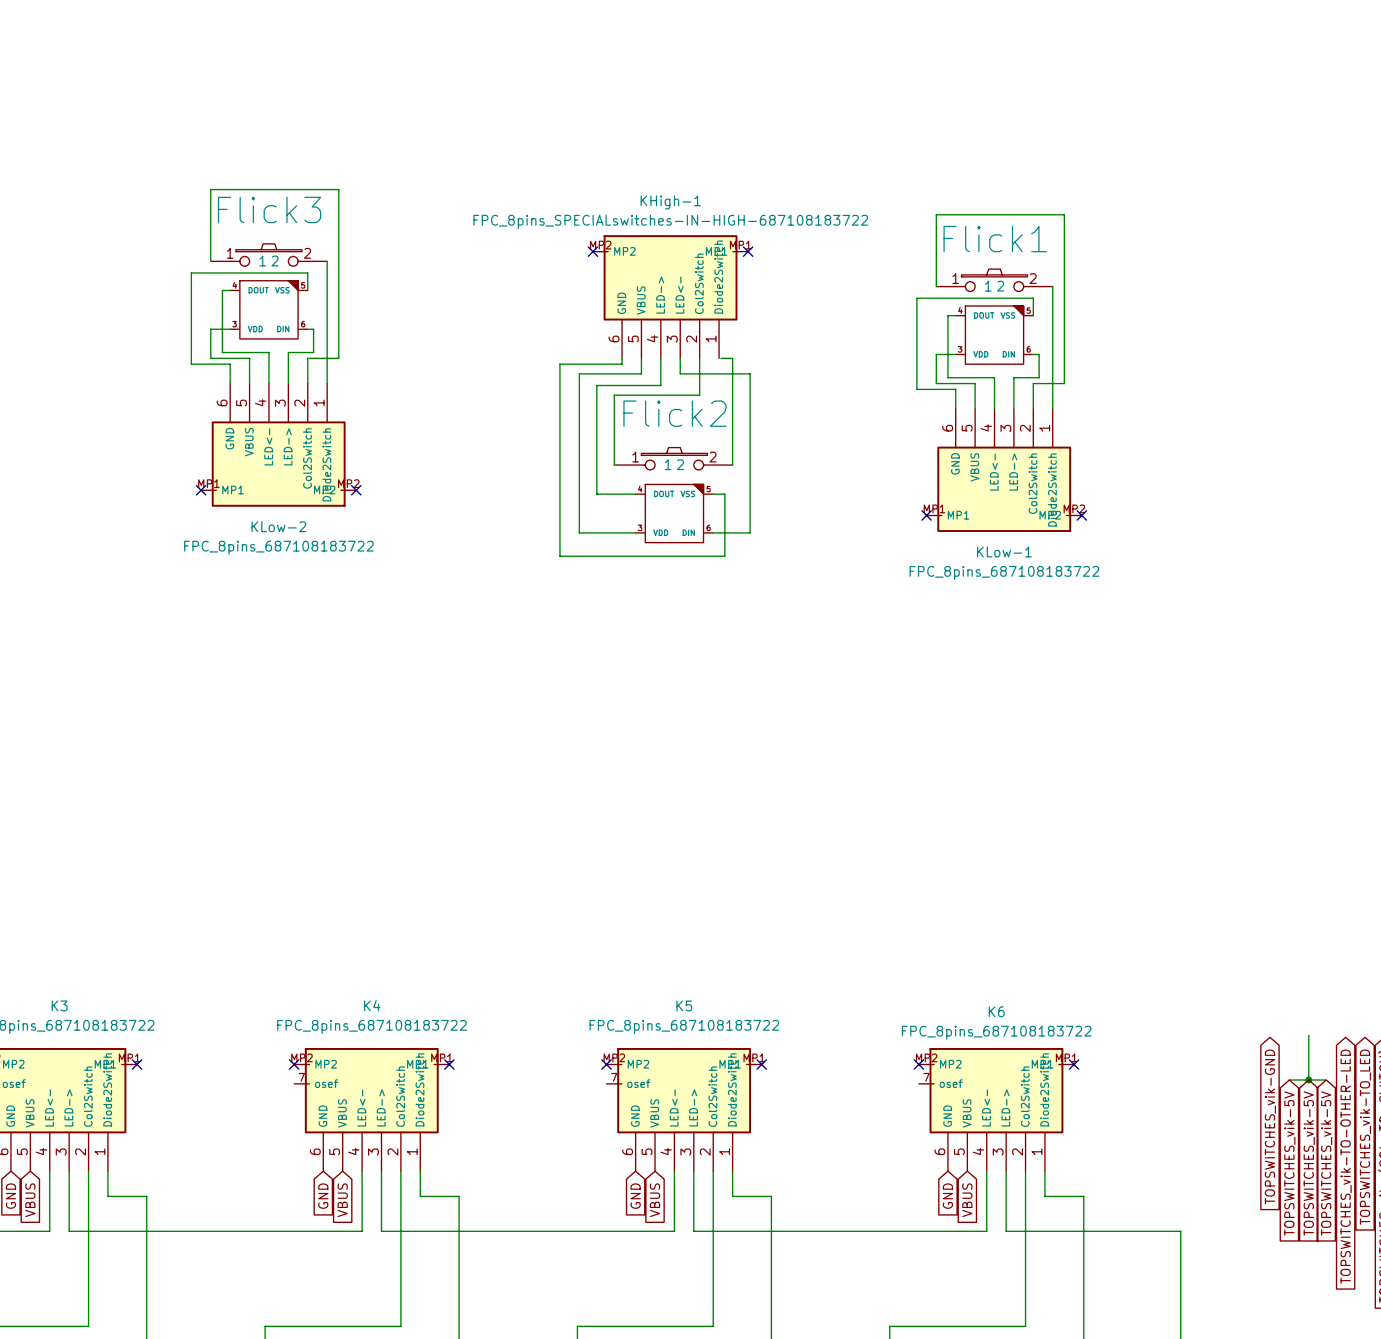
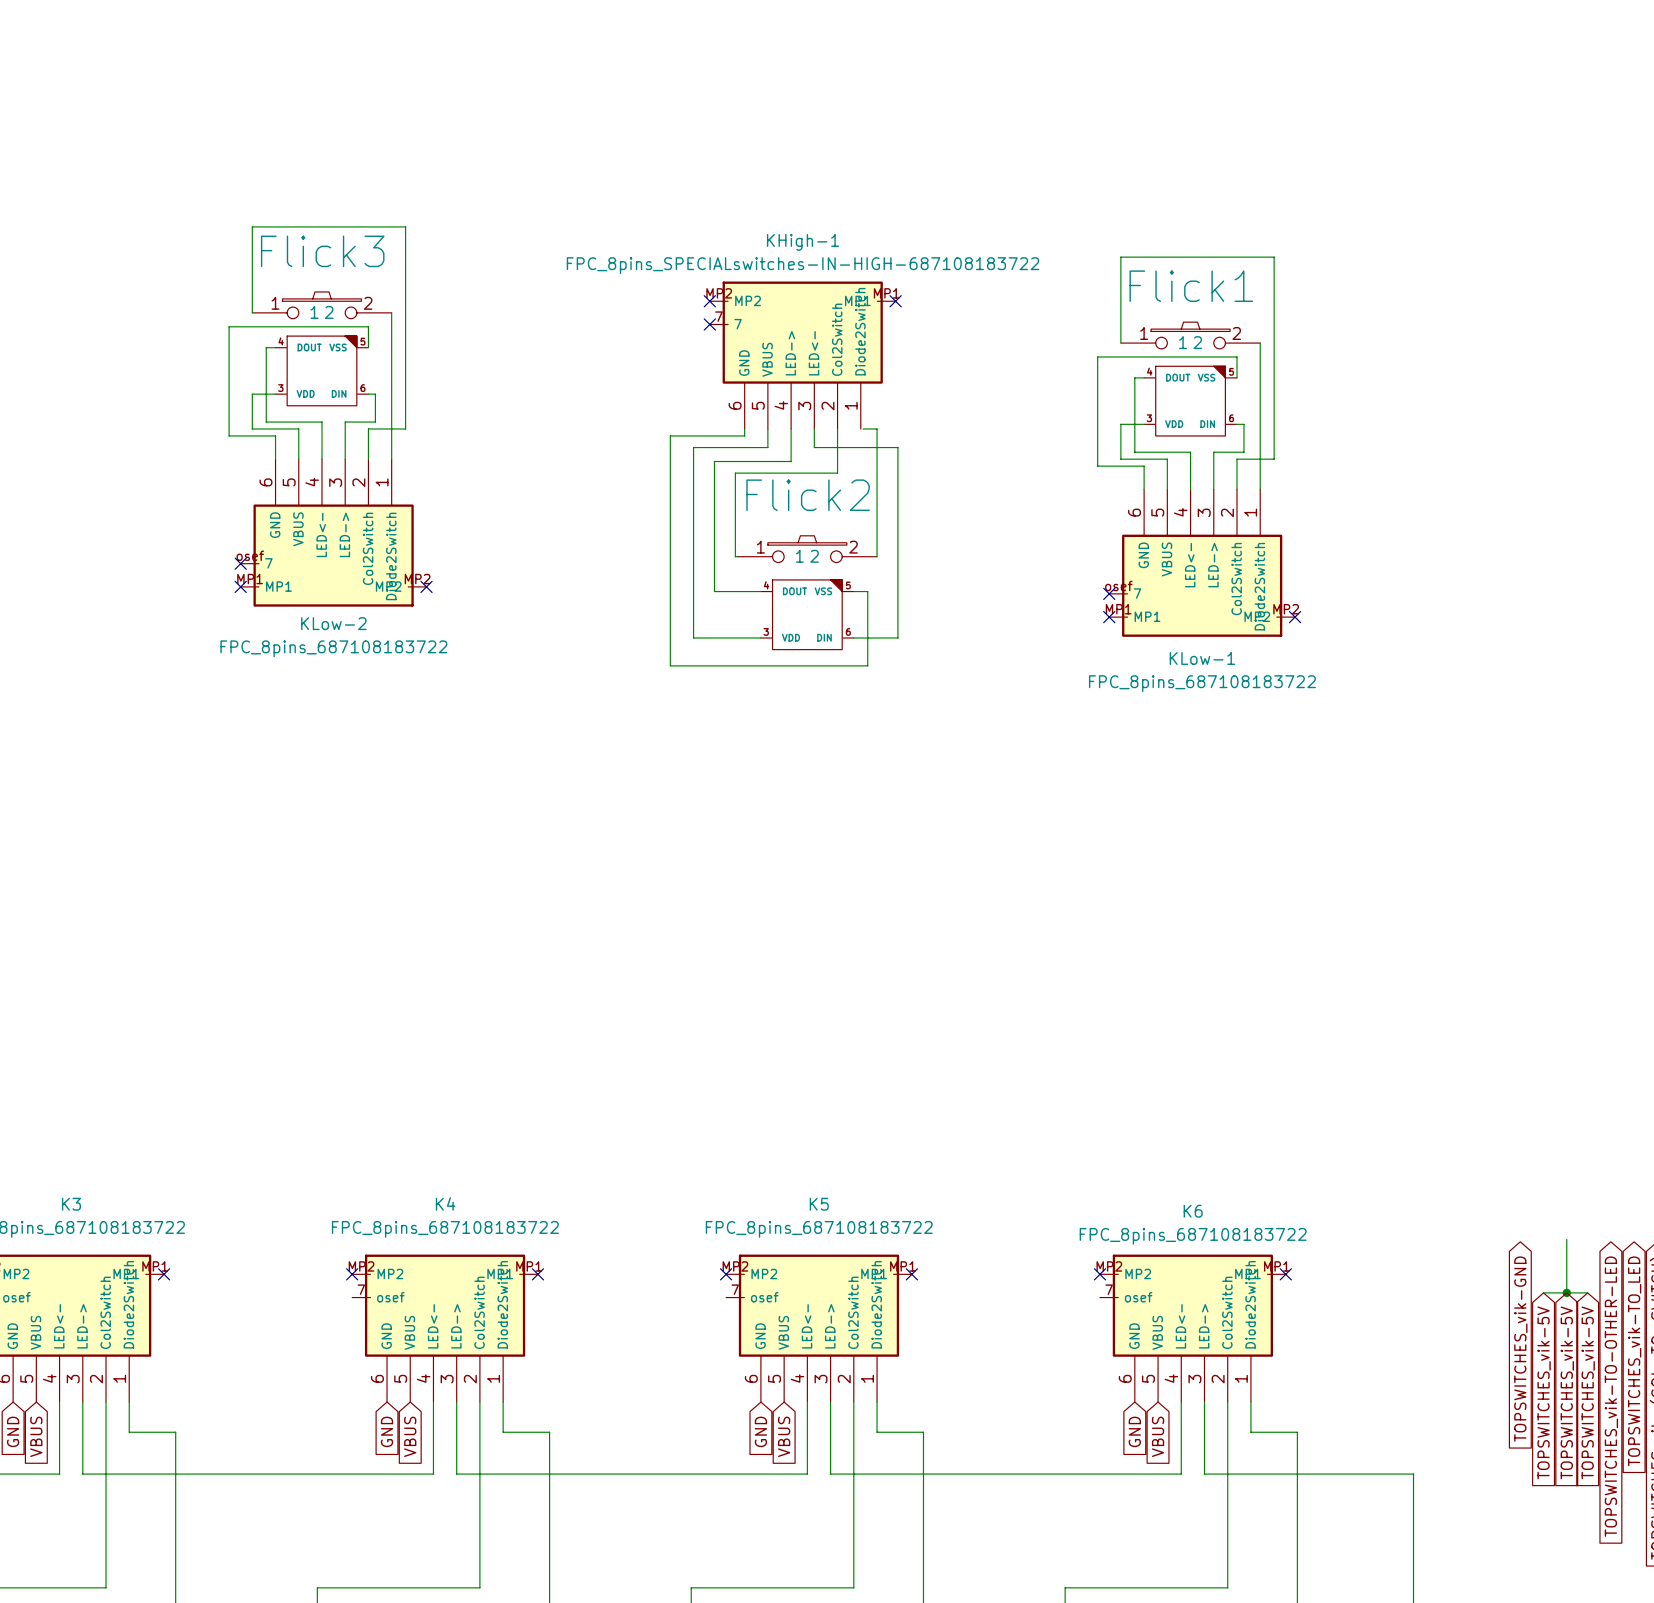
KHigh-1 symbol: [592, 235, 749, 359] -> [709, 281, 896, 429]
no-connect mark: none -> (709, 324)
KLow-2 symbol: [201, 383, 357, 507] -> [240, 459, 427, 607]
KLow-1 symbol: [926, 408, 1082, 532] -> [1109, 489, 1296, 637]
no-connect mark: none -> (240, 563)
no-connect mark: none -> (1109, 593)

